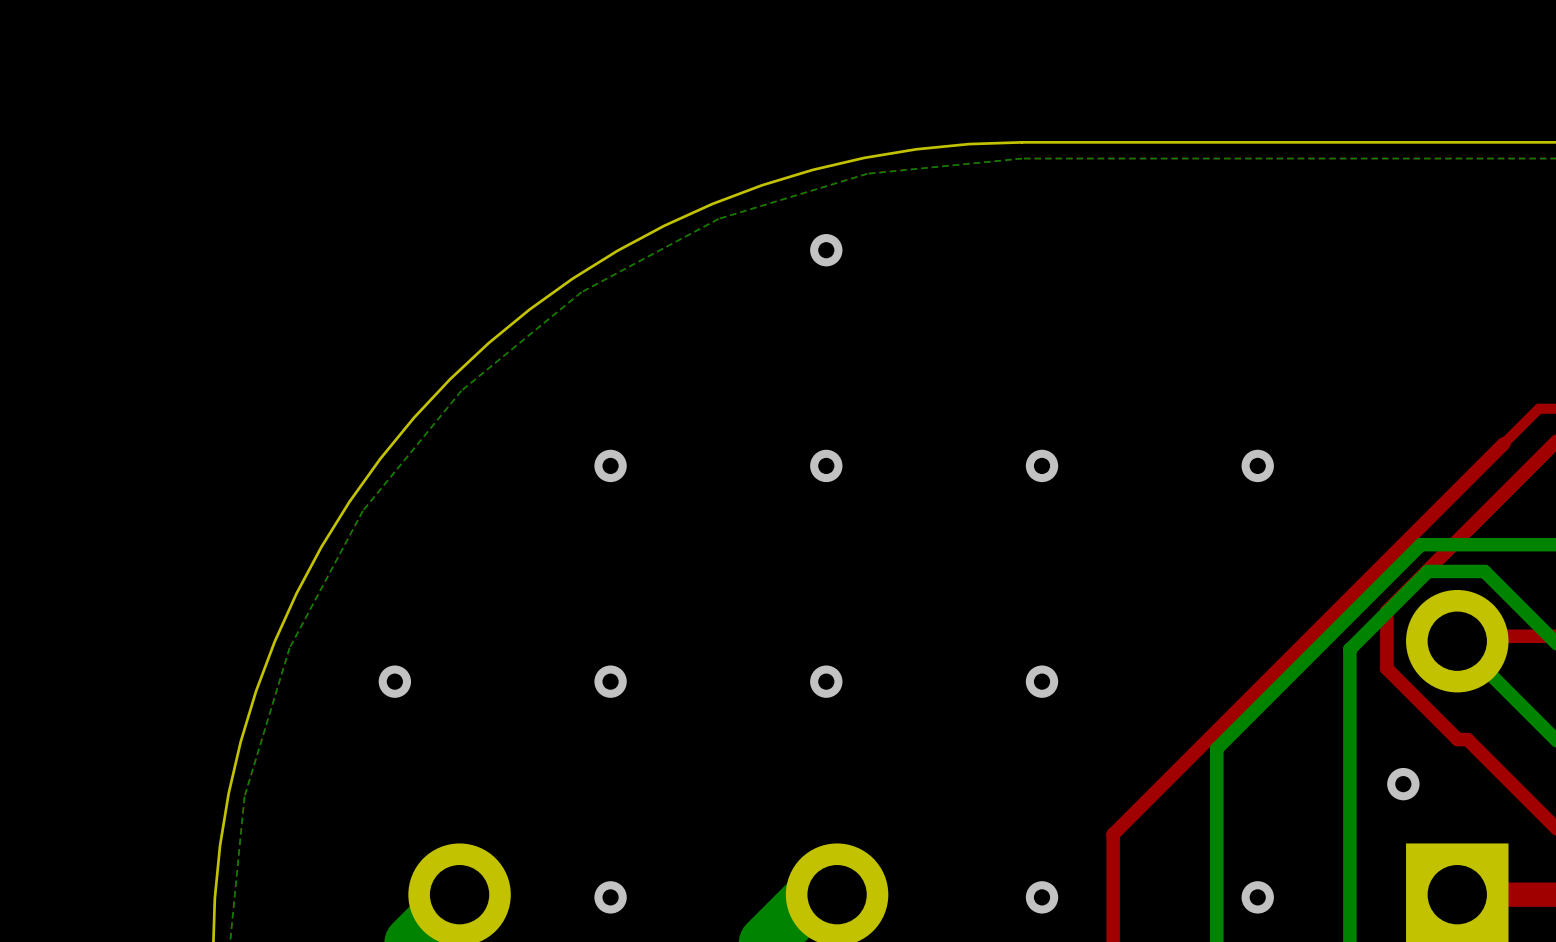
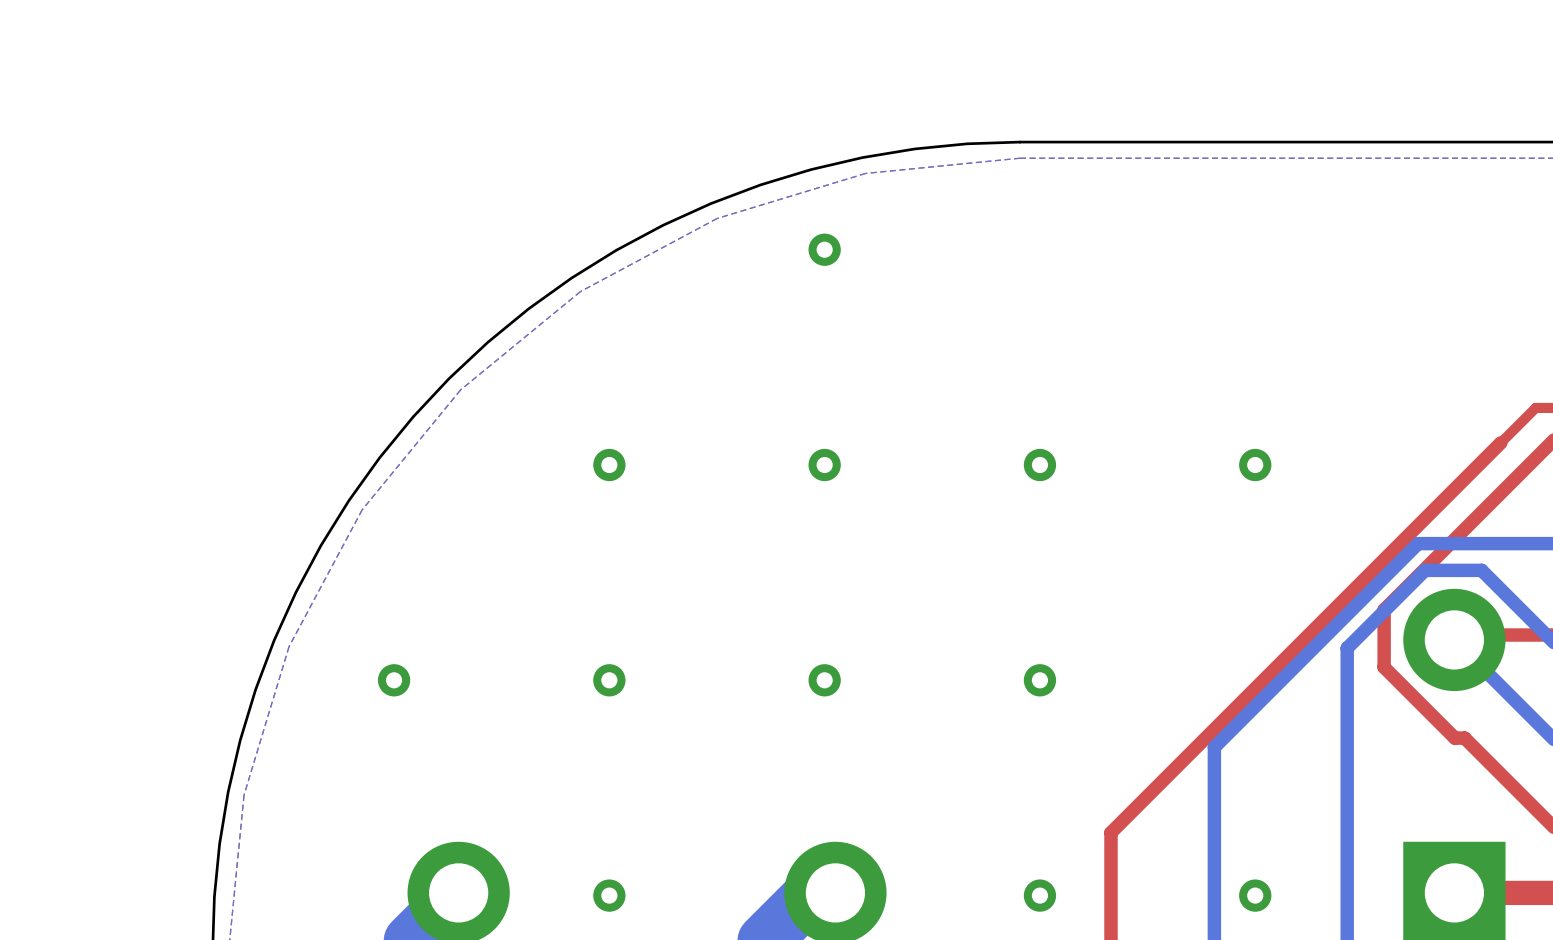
via: (1403, 784) -> none

